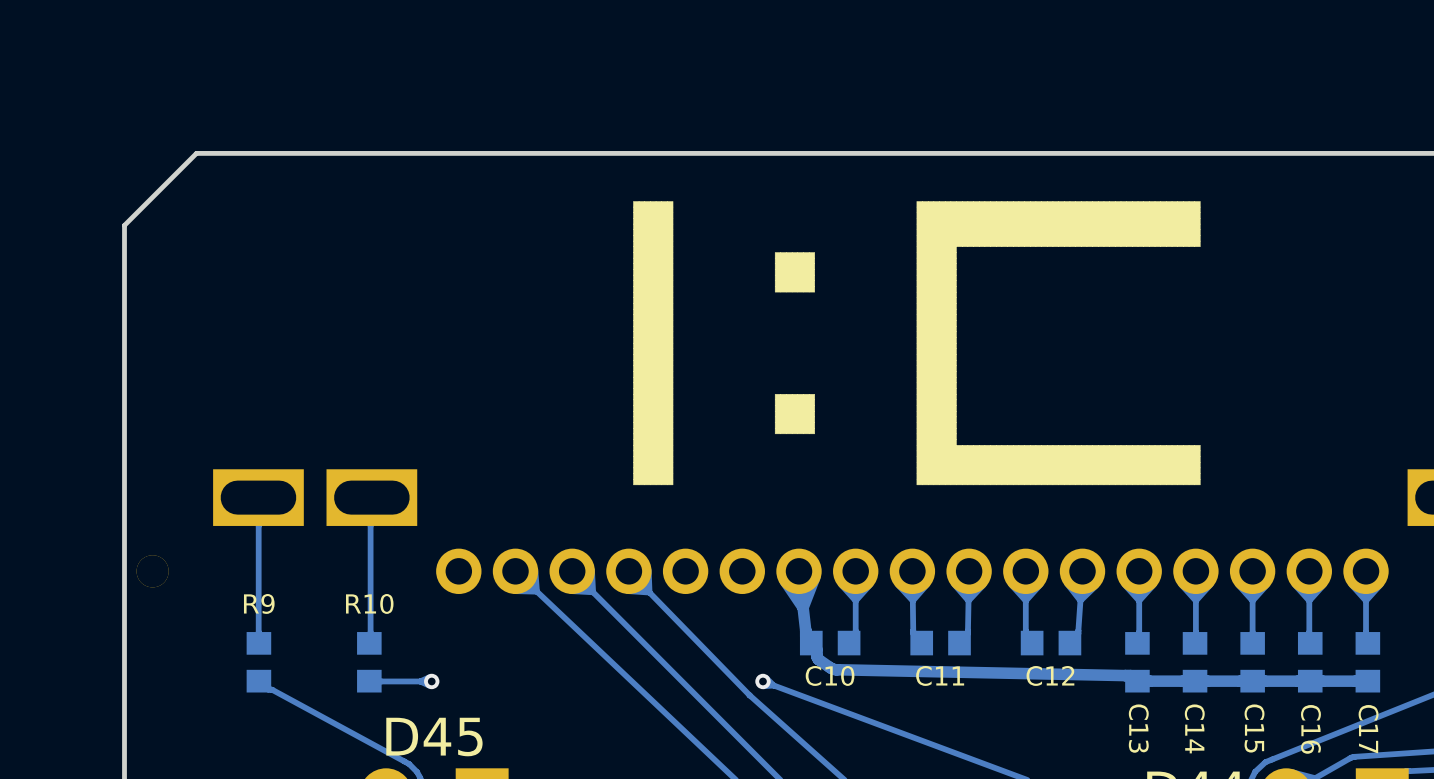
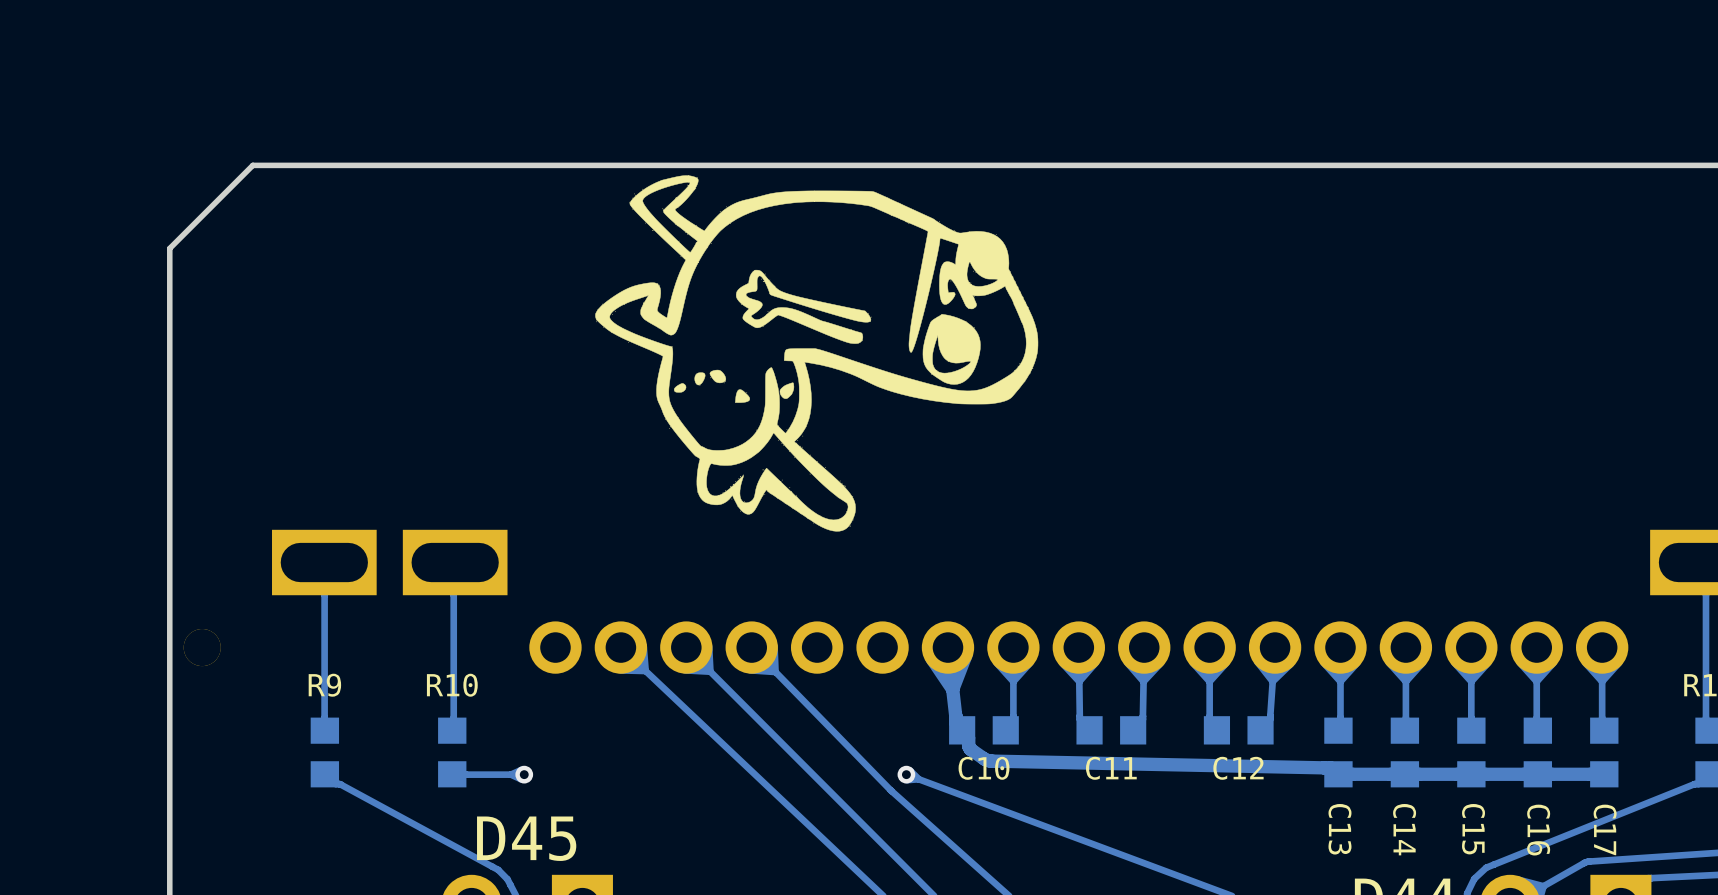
drawing: none -> [595, 175, 1039, 532]
drawing: [633, 201, 1201, 486] -> none

